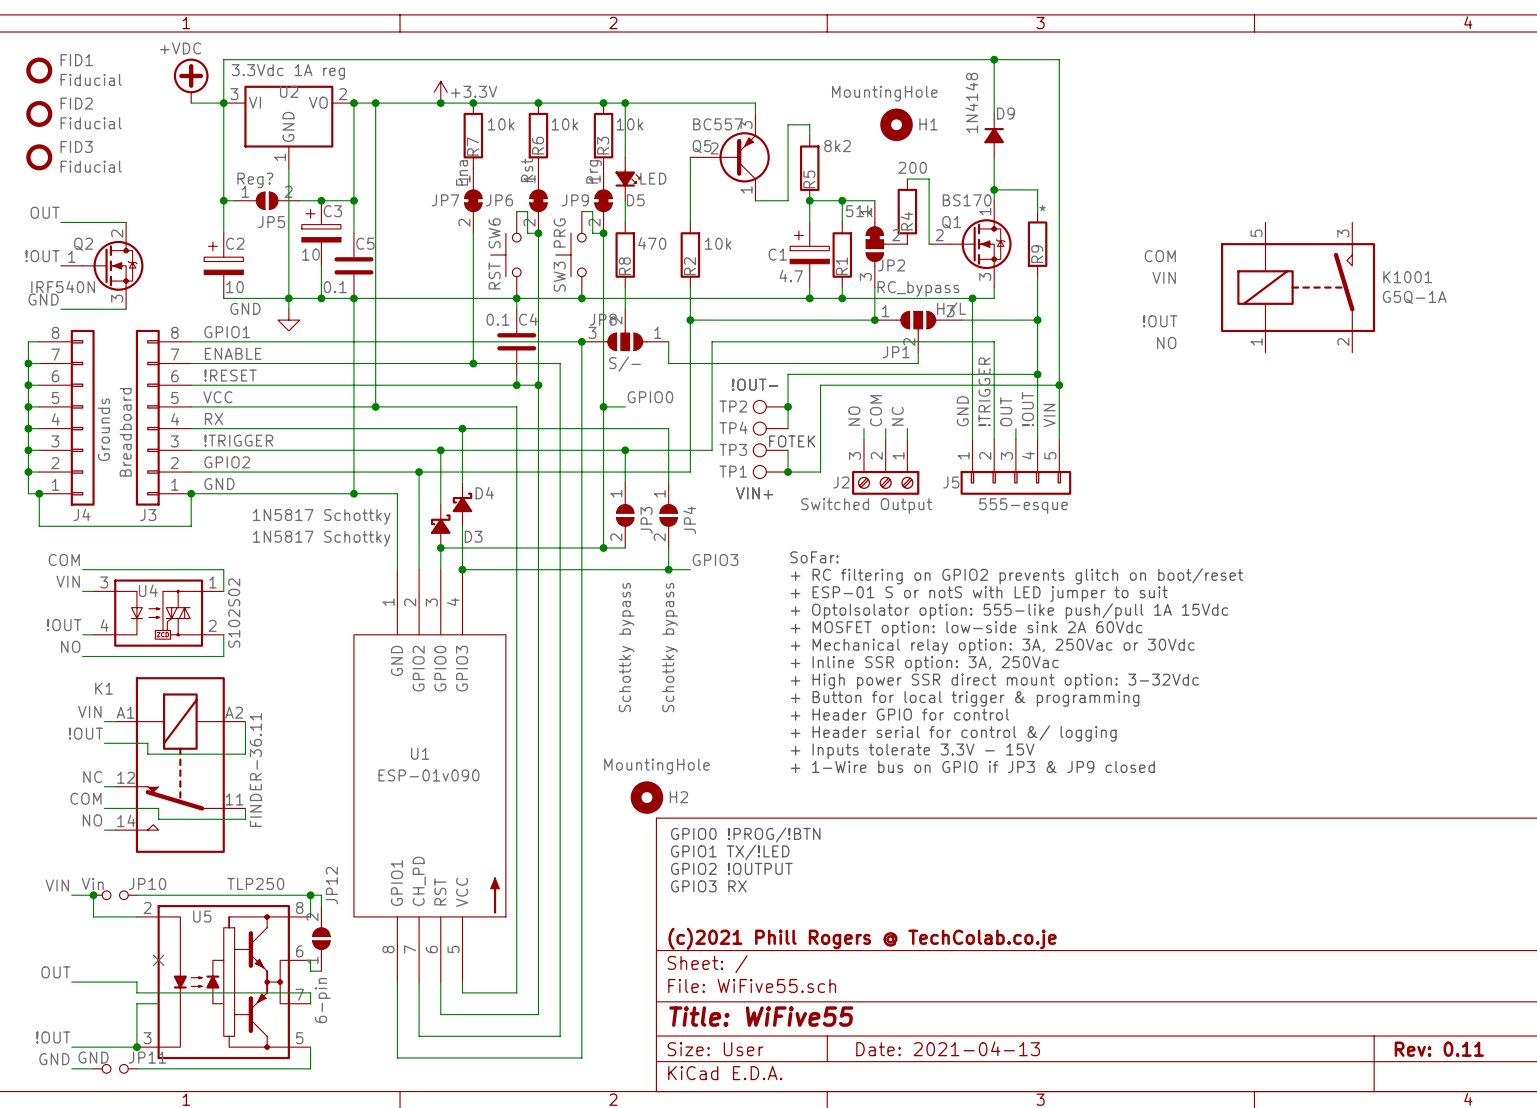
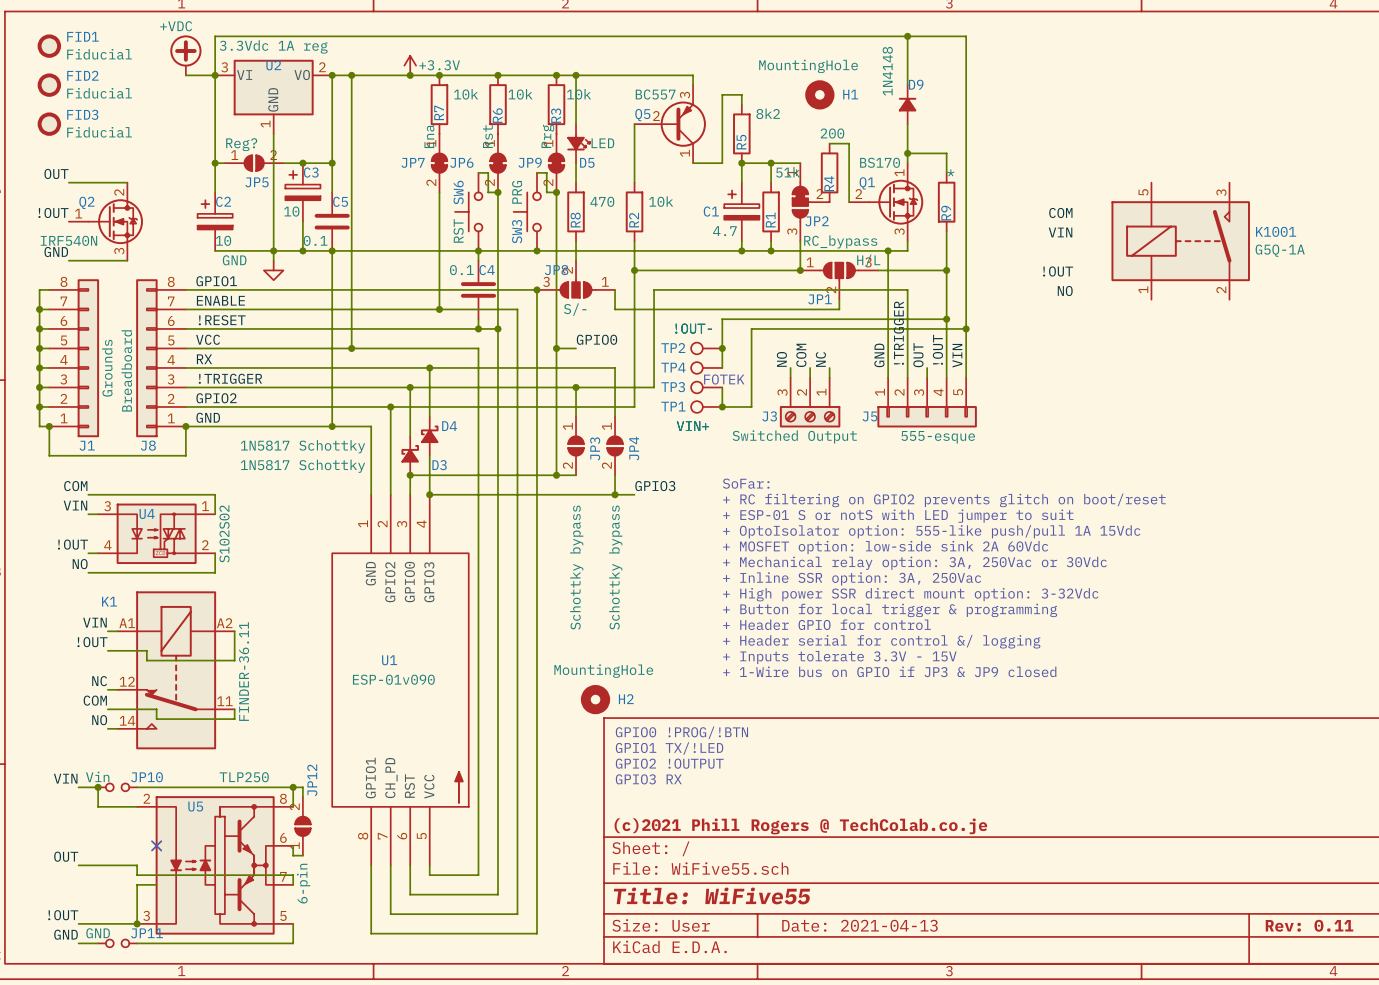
J2 name: J2 (841, 482) -> J3 (769, 416)
J4 name: J4 (81, 514) -> J1 (87, 445)
J3 name: J3 (148, 515) -> J8 (148, 445)

